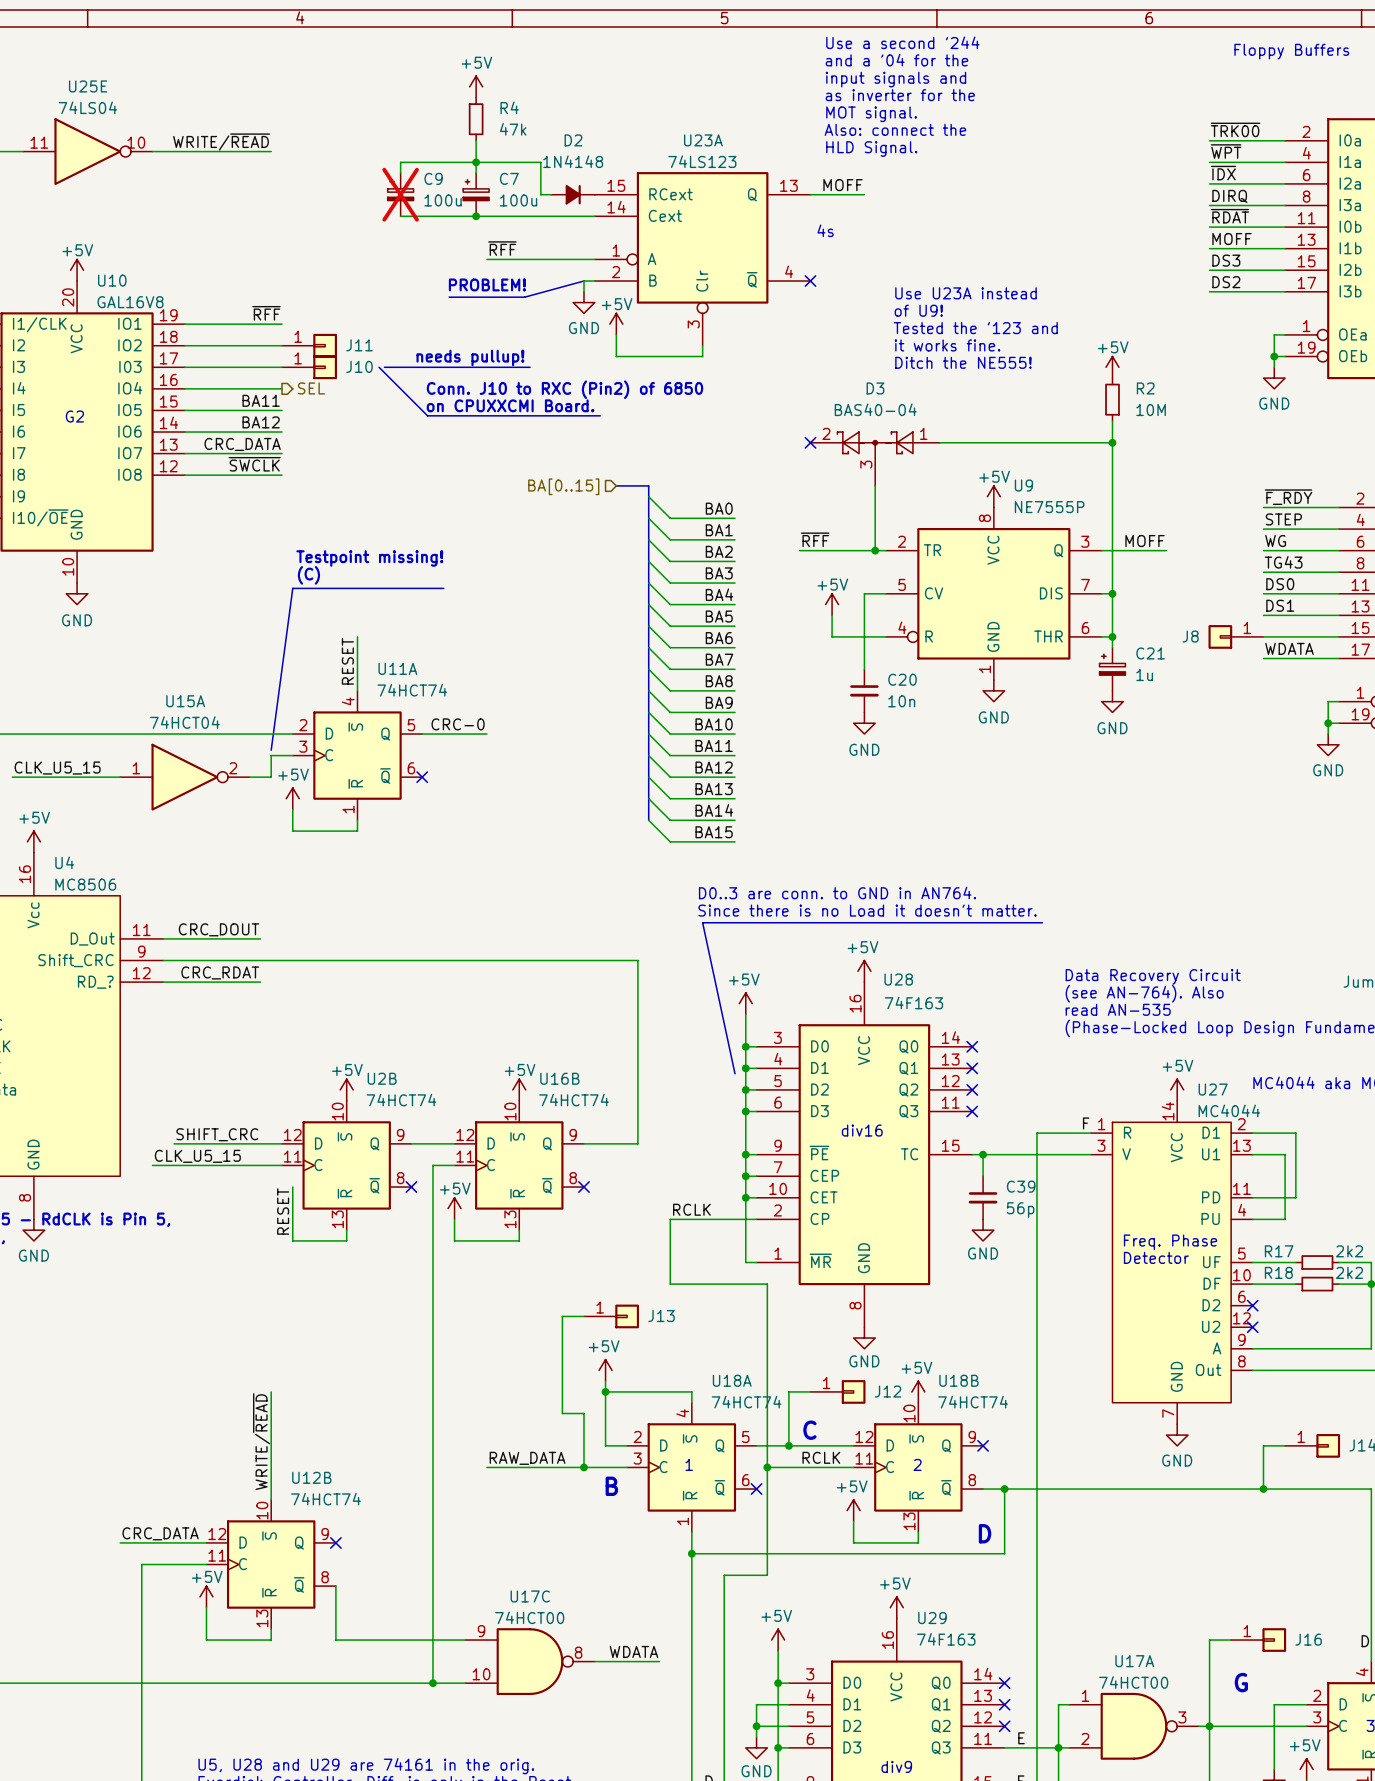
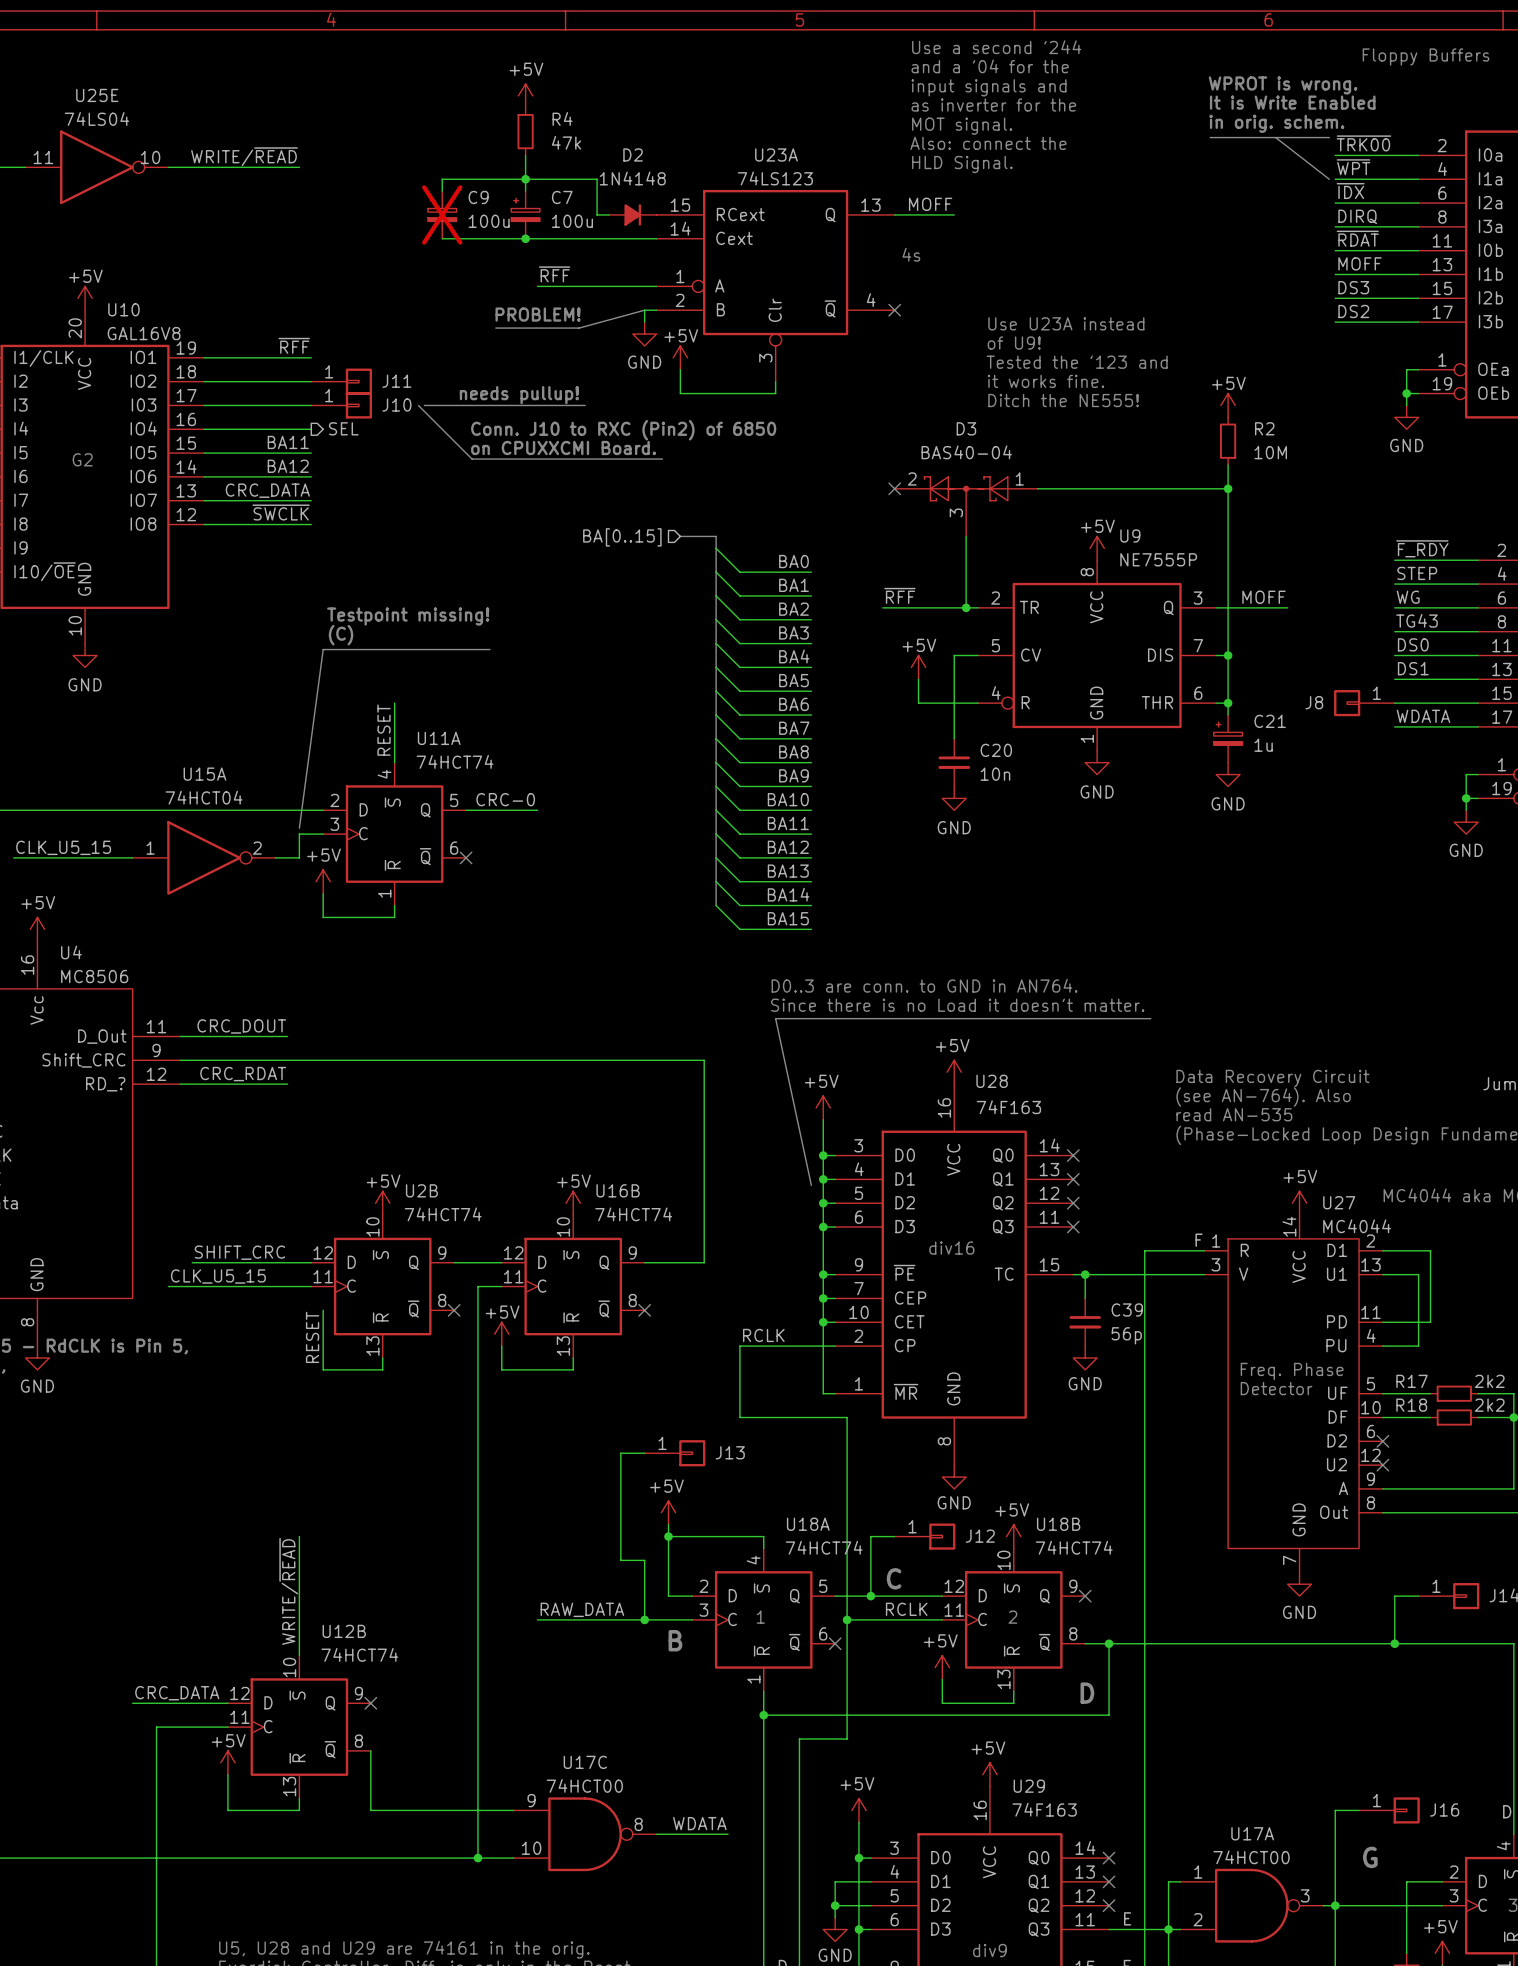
text: none -> WPROT is wrong. (1283, 85)
text: none -> It is Write Enabled (1292, 102)
text: none -> in orig. schem. (1276, 123)
line: none -> (1210, 137) (1329, 137)
line: none -> (1275, 137) (1329, 179)

